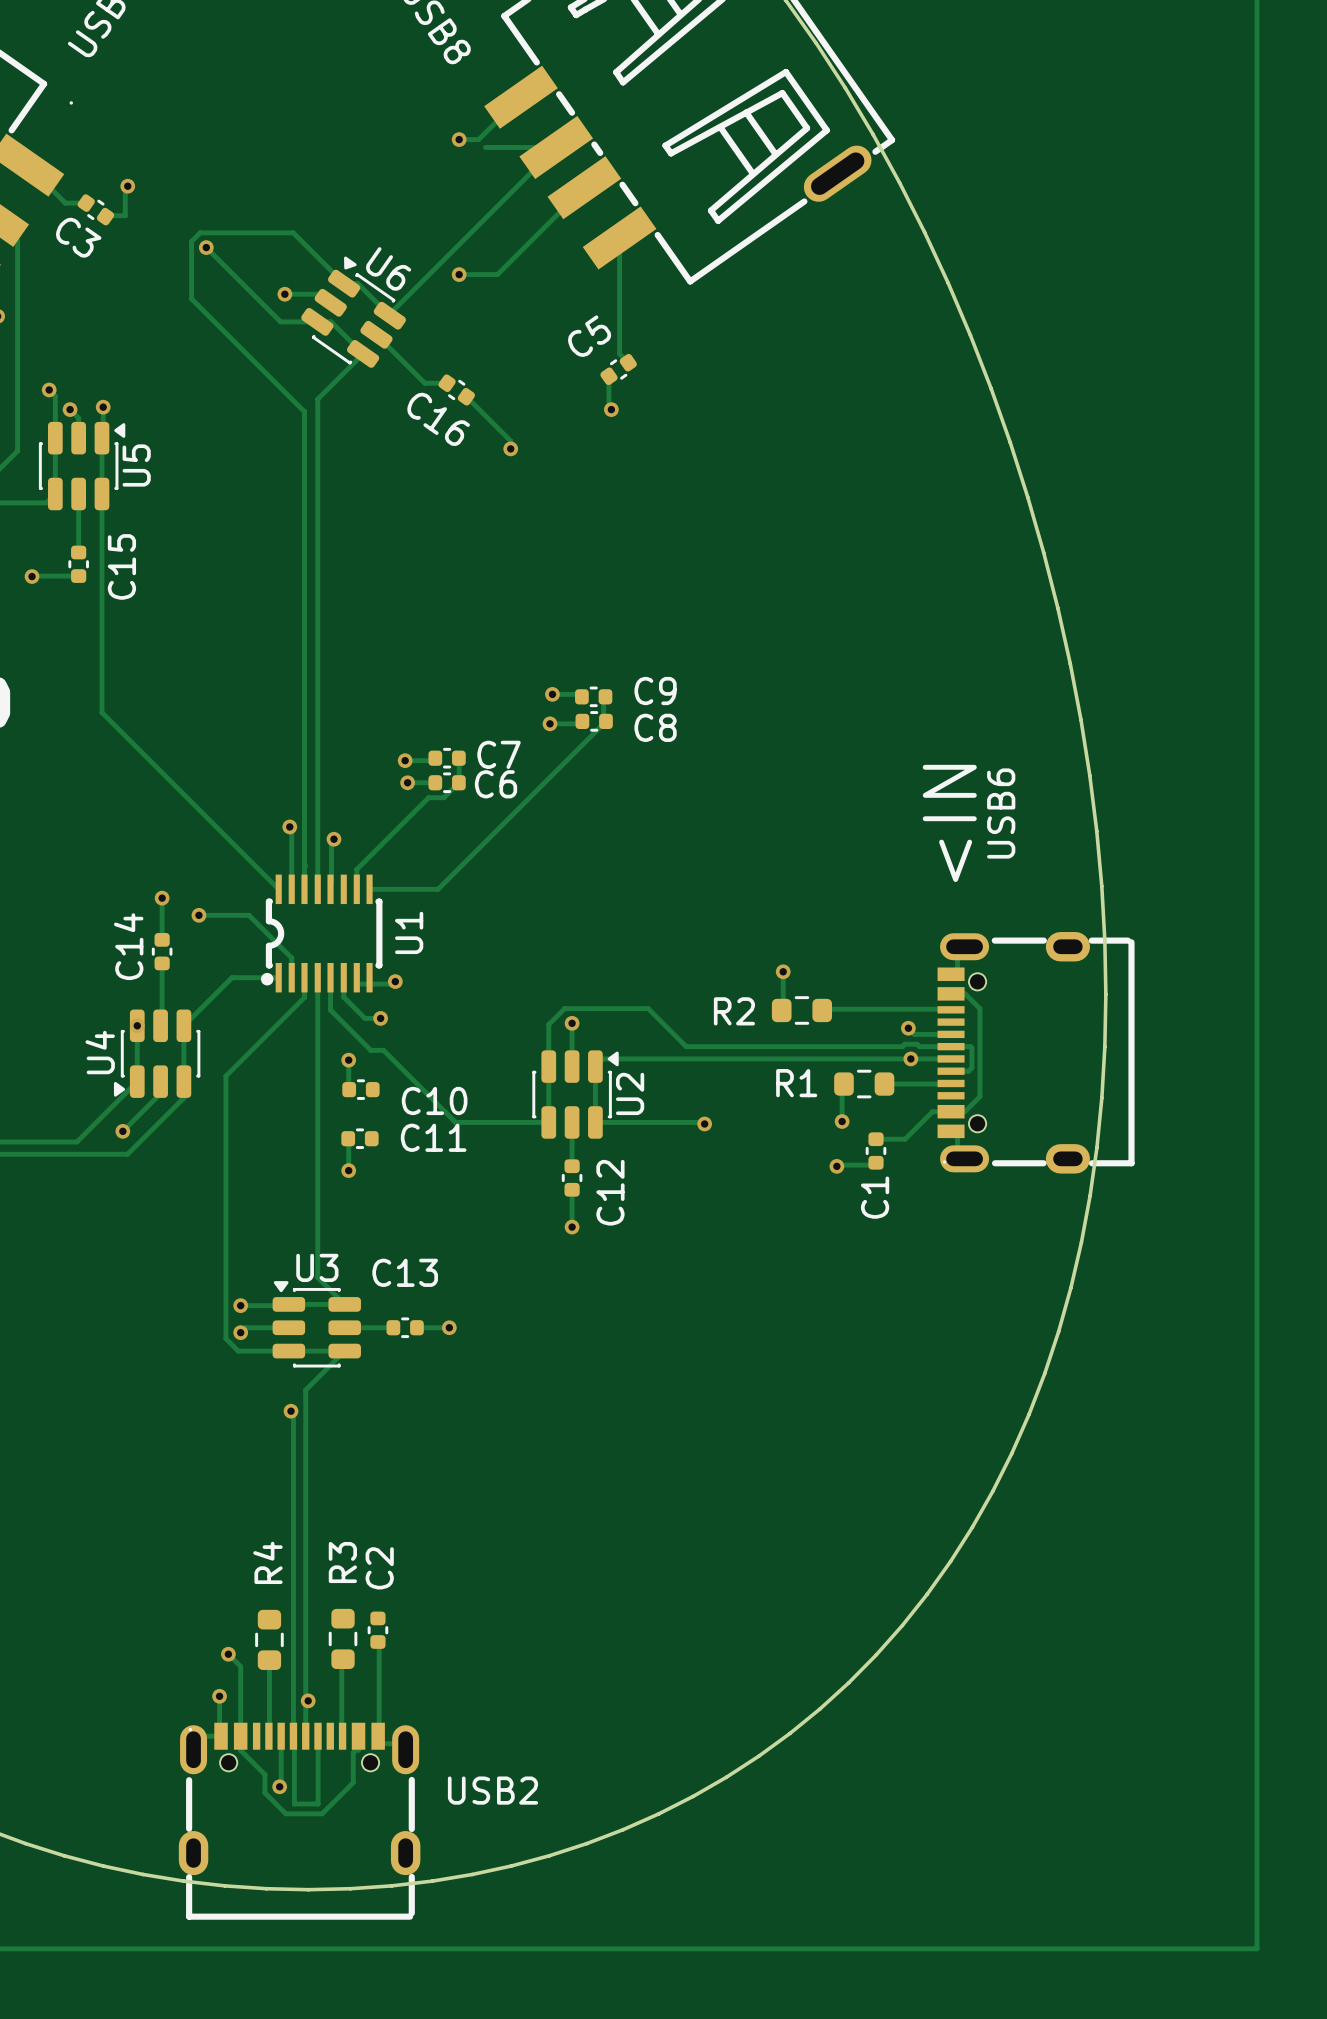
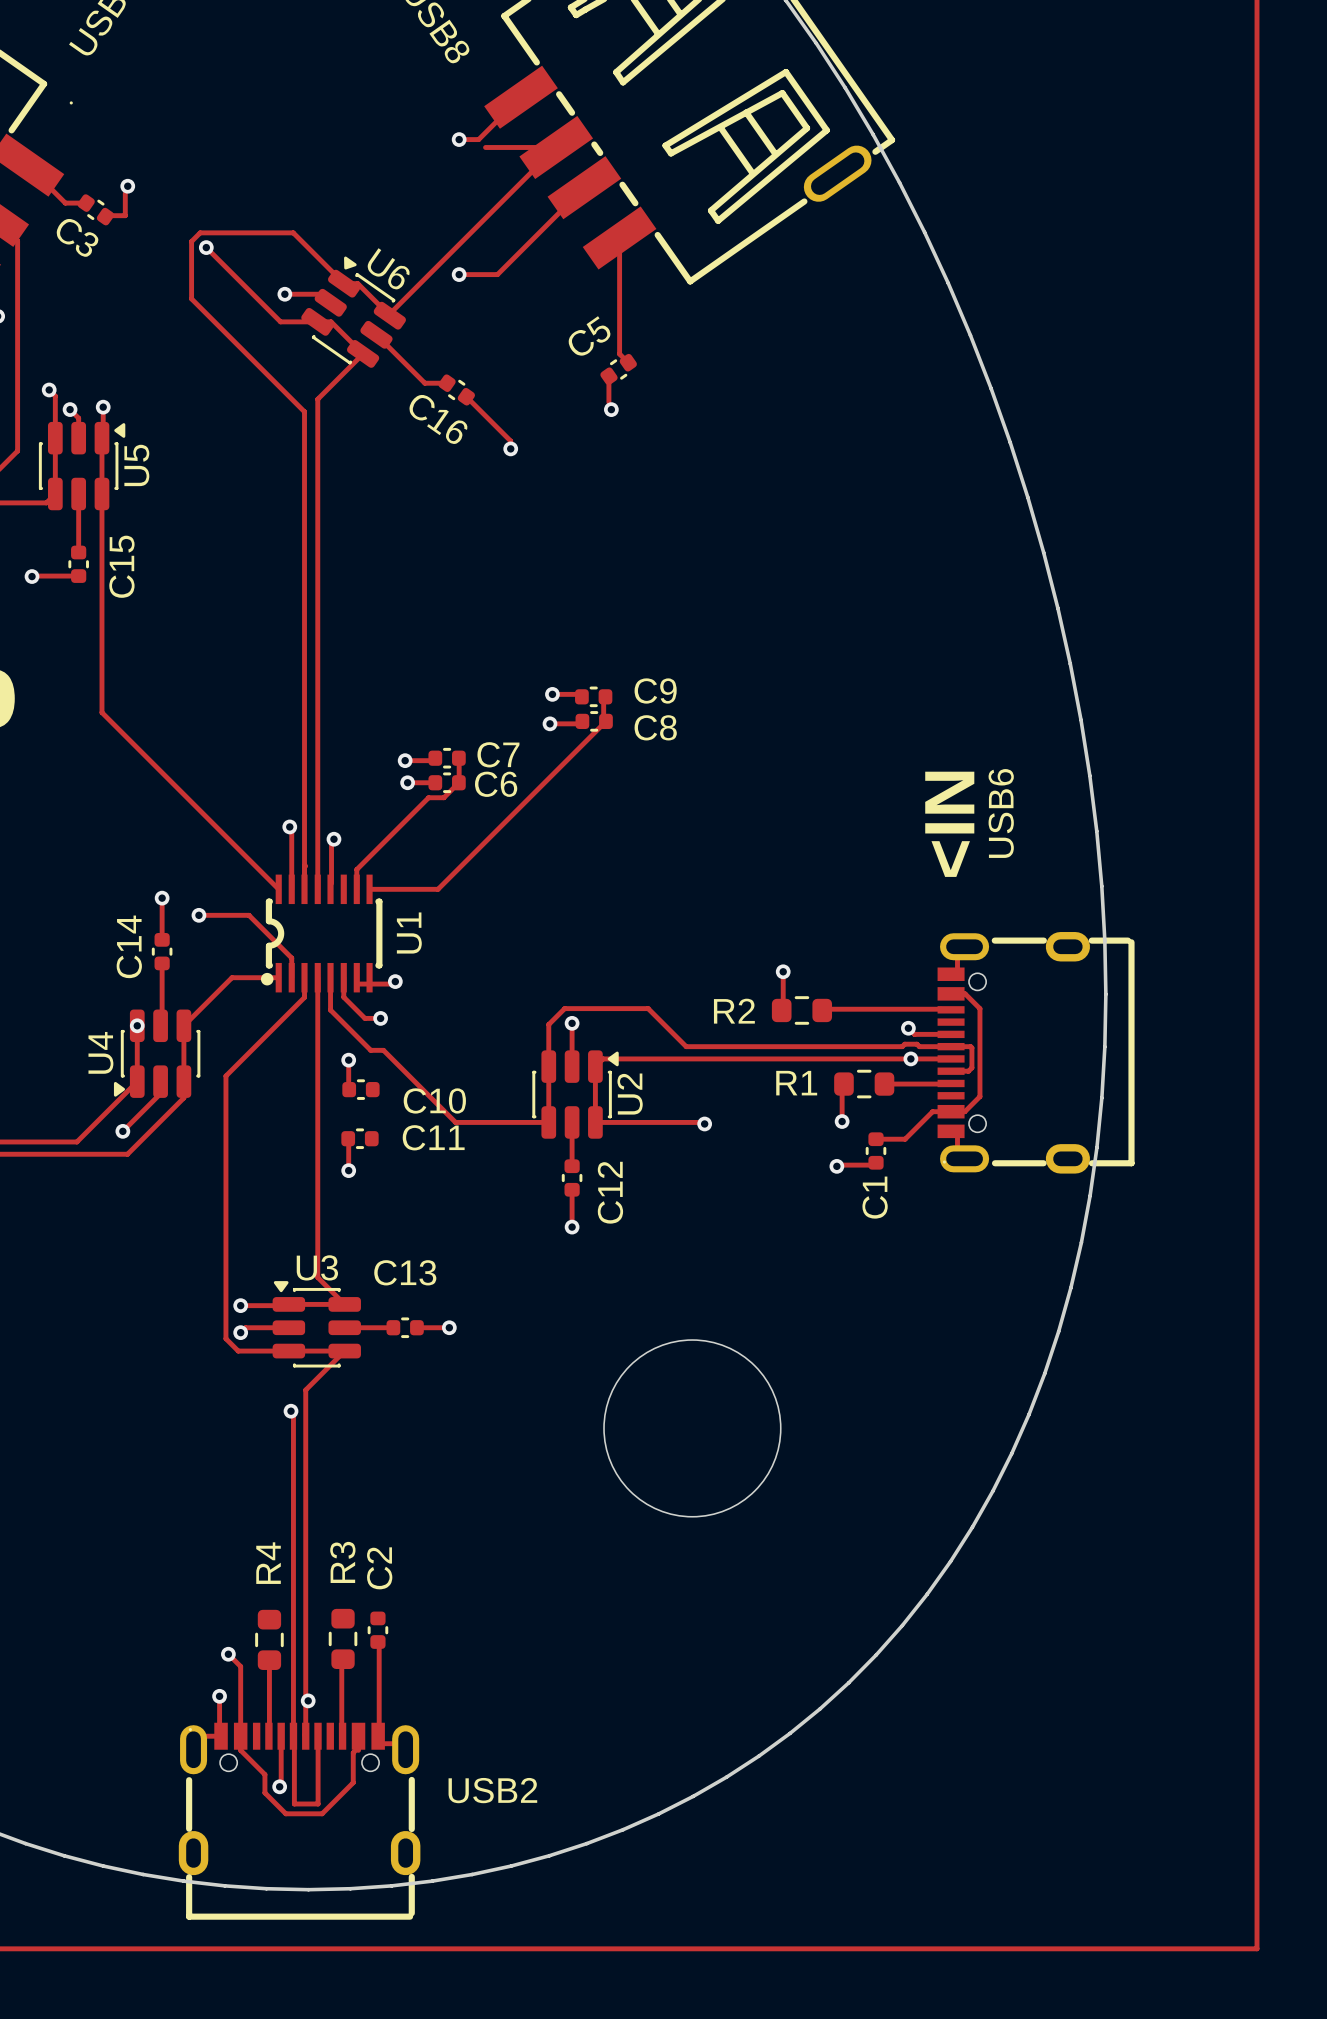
round board edge: none -> [603, 1339, 782, 1518]

